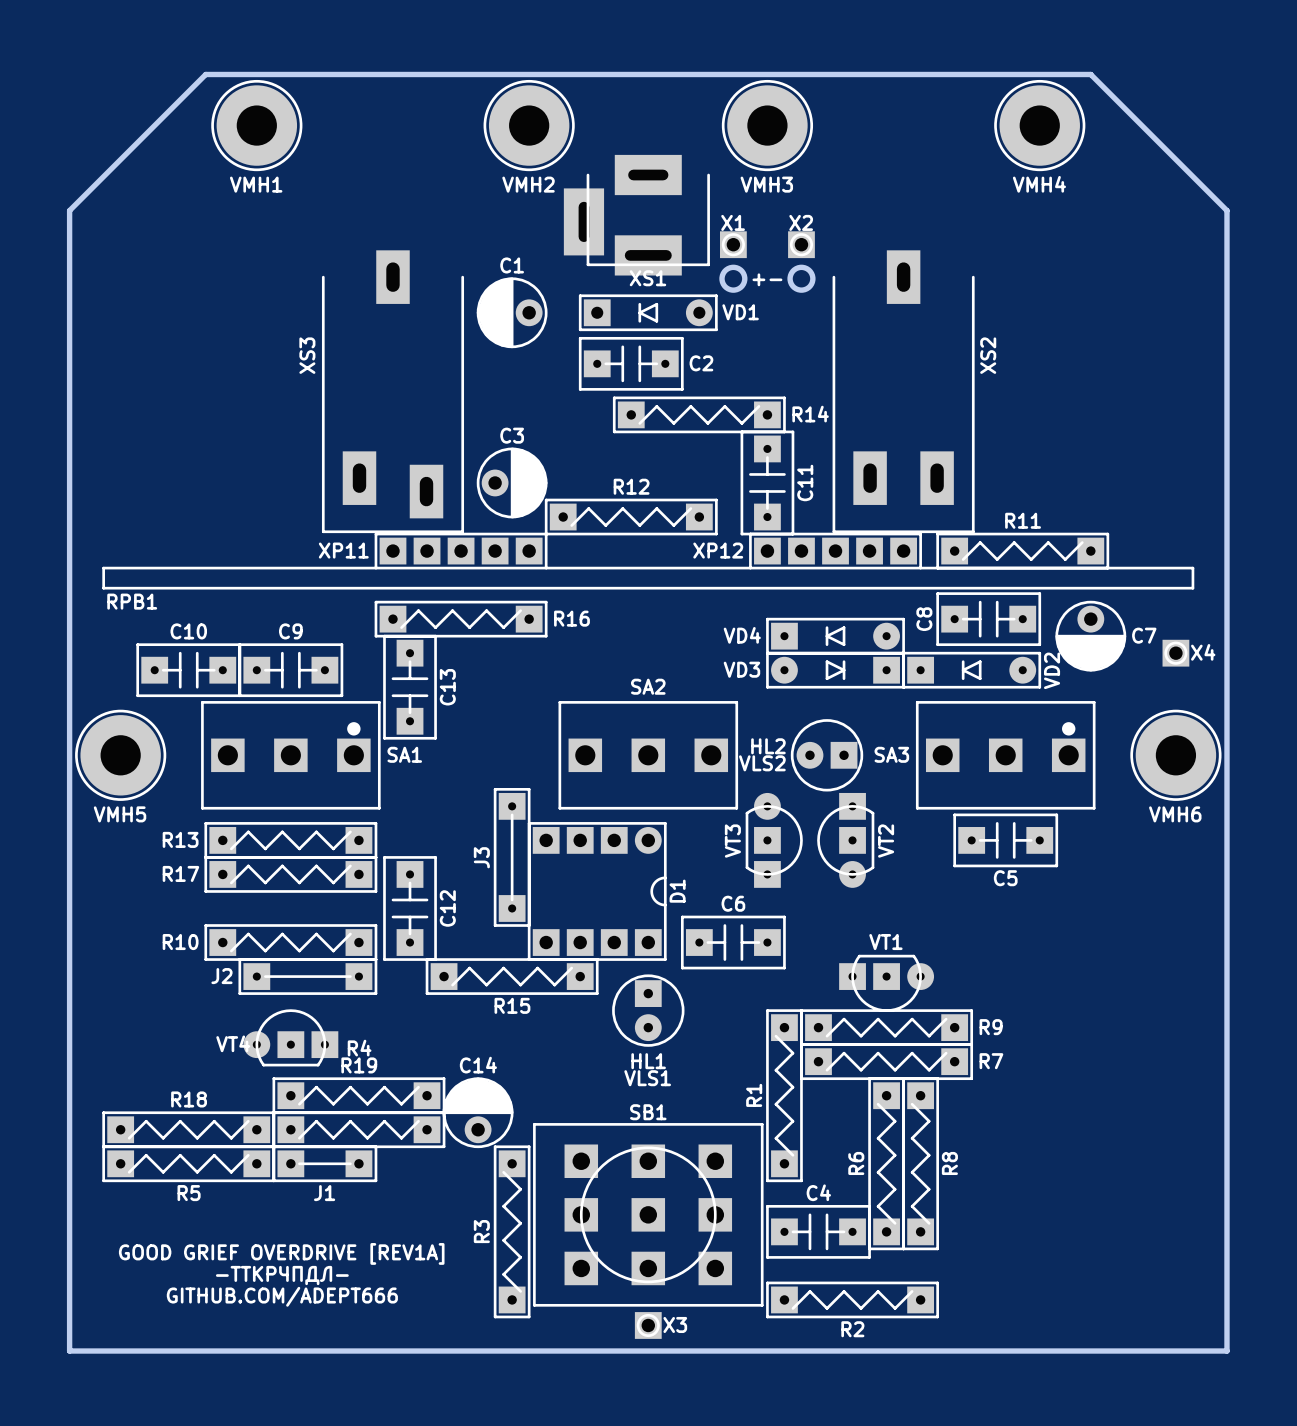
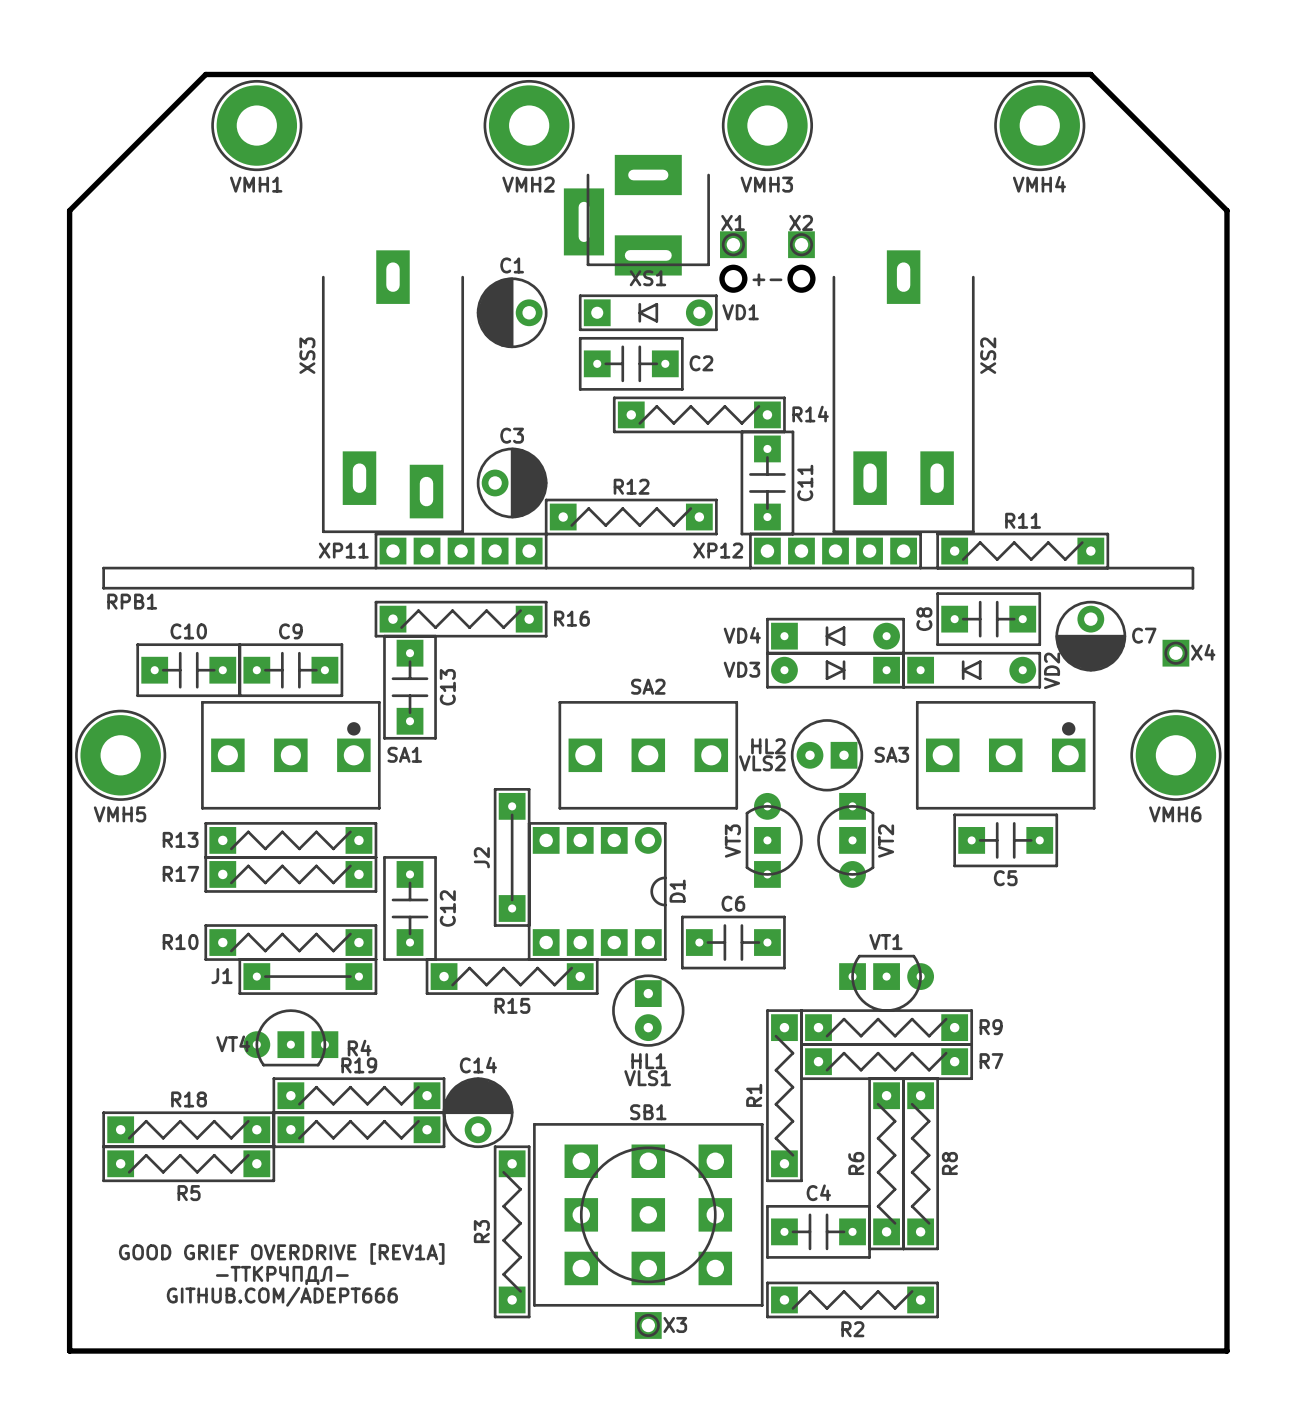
J3 name: J3 (481, 857) -> J2 (481, 857)
J2 name: J2 (221, 976) -> J1 (221, 976)
J1: (324, 1163) -> none

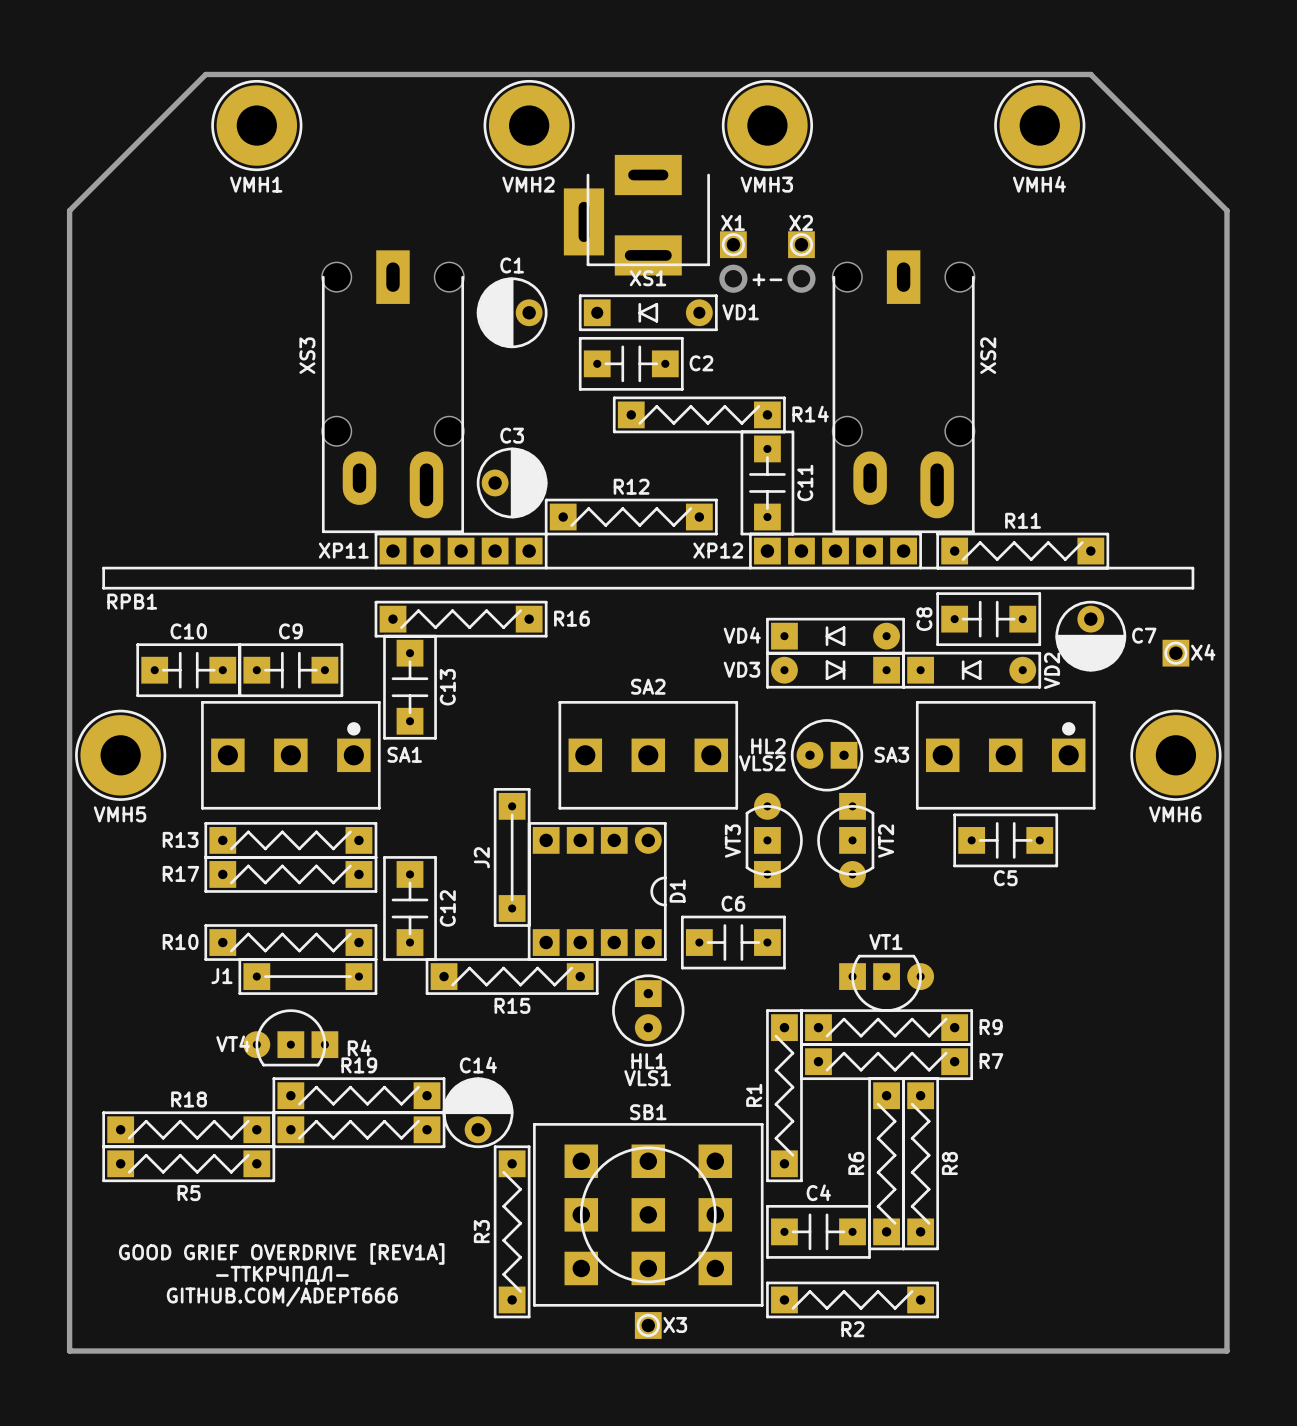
XS3 footprint: [321, 250, 465, 534] -> [321, 250, 465, 534]
XS2 footprint: [832, 250, 975, 534] -> [832, 250, 975, 534]

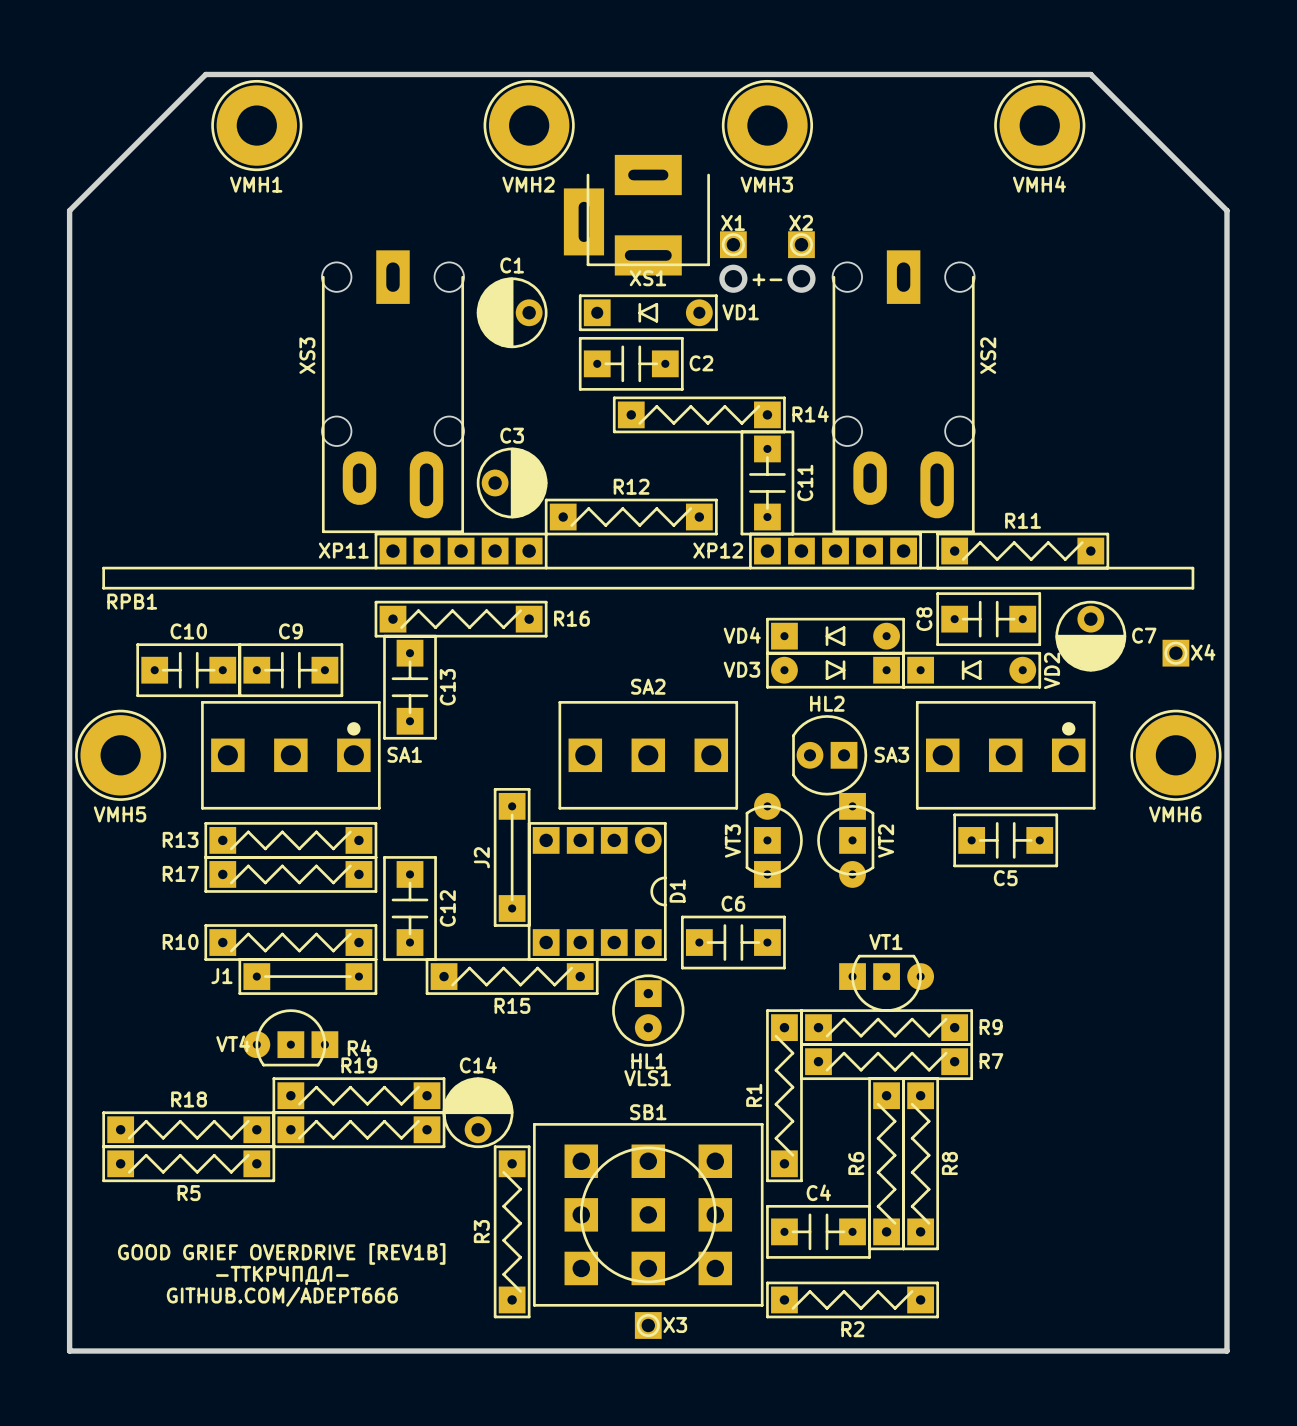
HL2 footprint: [796, 741, 858, 769] -> [792, 715, 868, 796]
HL2 name position: HL2 (768, 746) -> HL2 (827, 703)
VLS2: (827, 755) -> none
text: GOOD GRIEF OVERDRIVE [REV1A] (281, 1253) -> GOOD GRIEF OVERDRIVE [REV1B] (281, 1253)

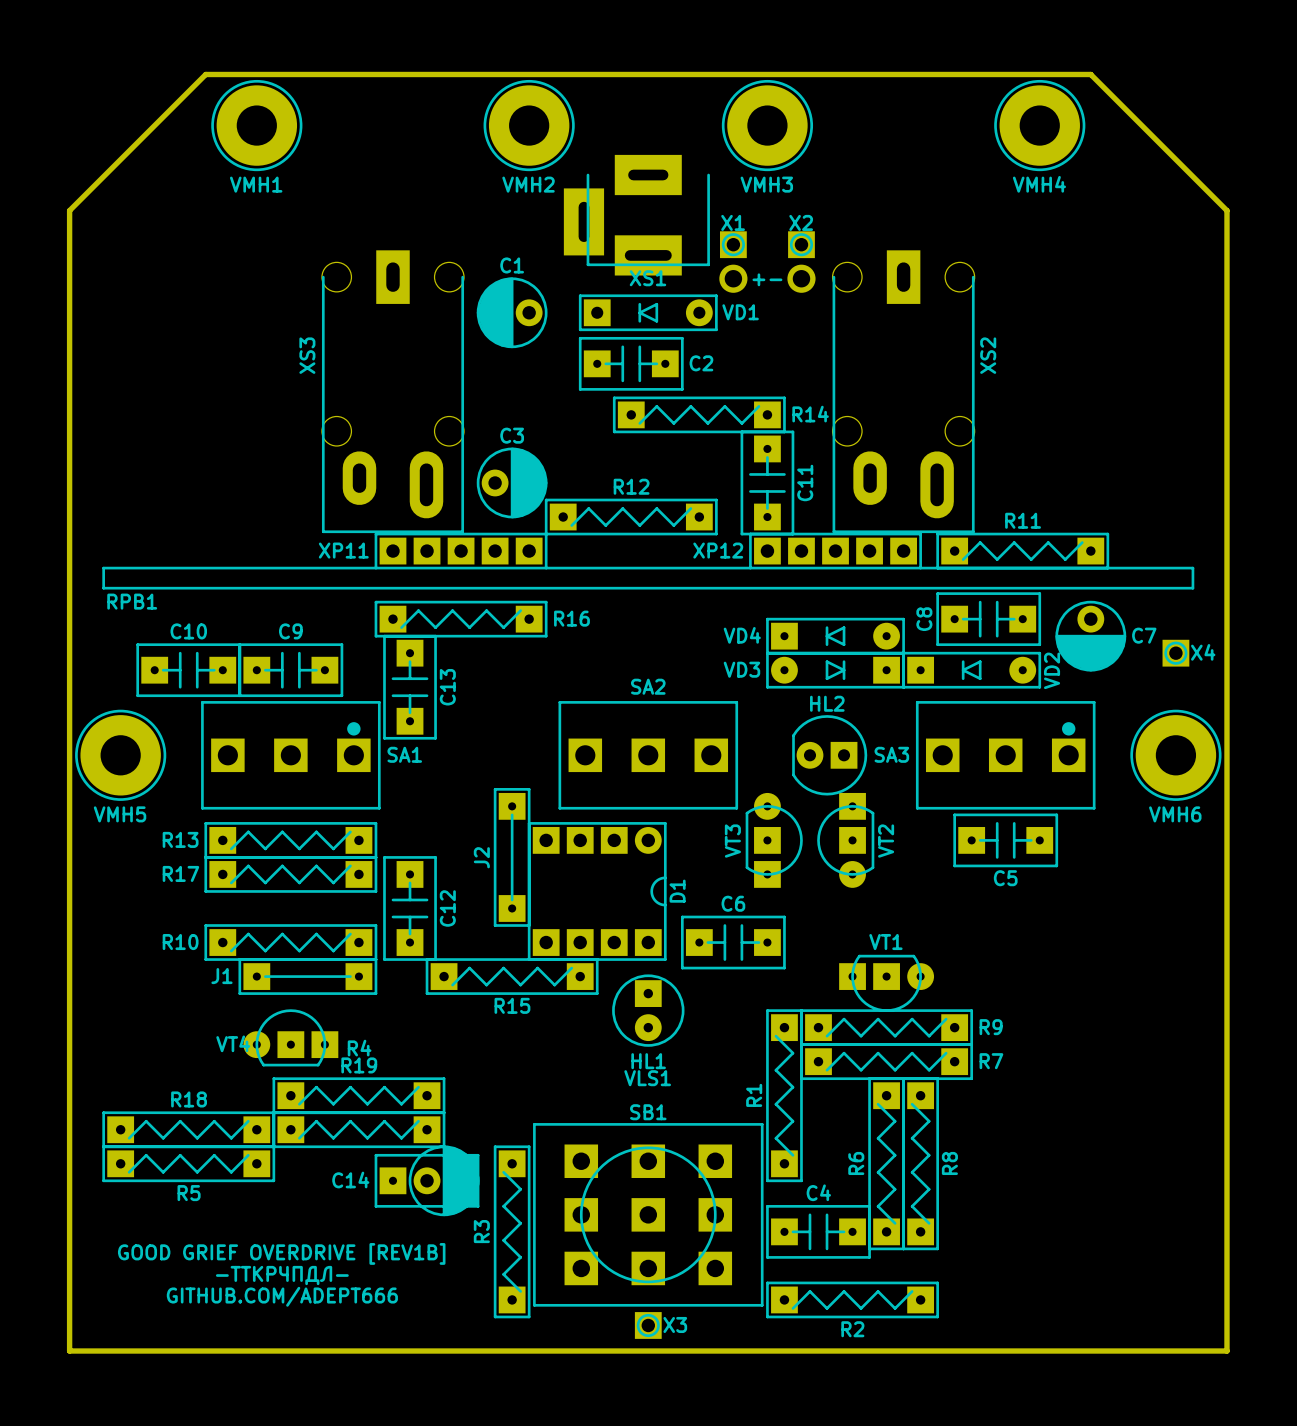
C14 name position: C14 (478, 1065) -> C14 (350, 1179)
C14 footprint: [442, 1077, 514, 1149] -> [374, 1145, 480, 1217]

